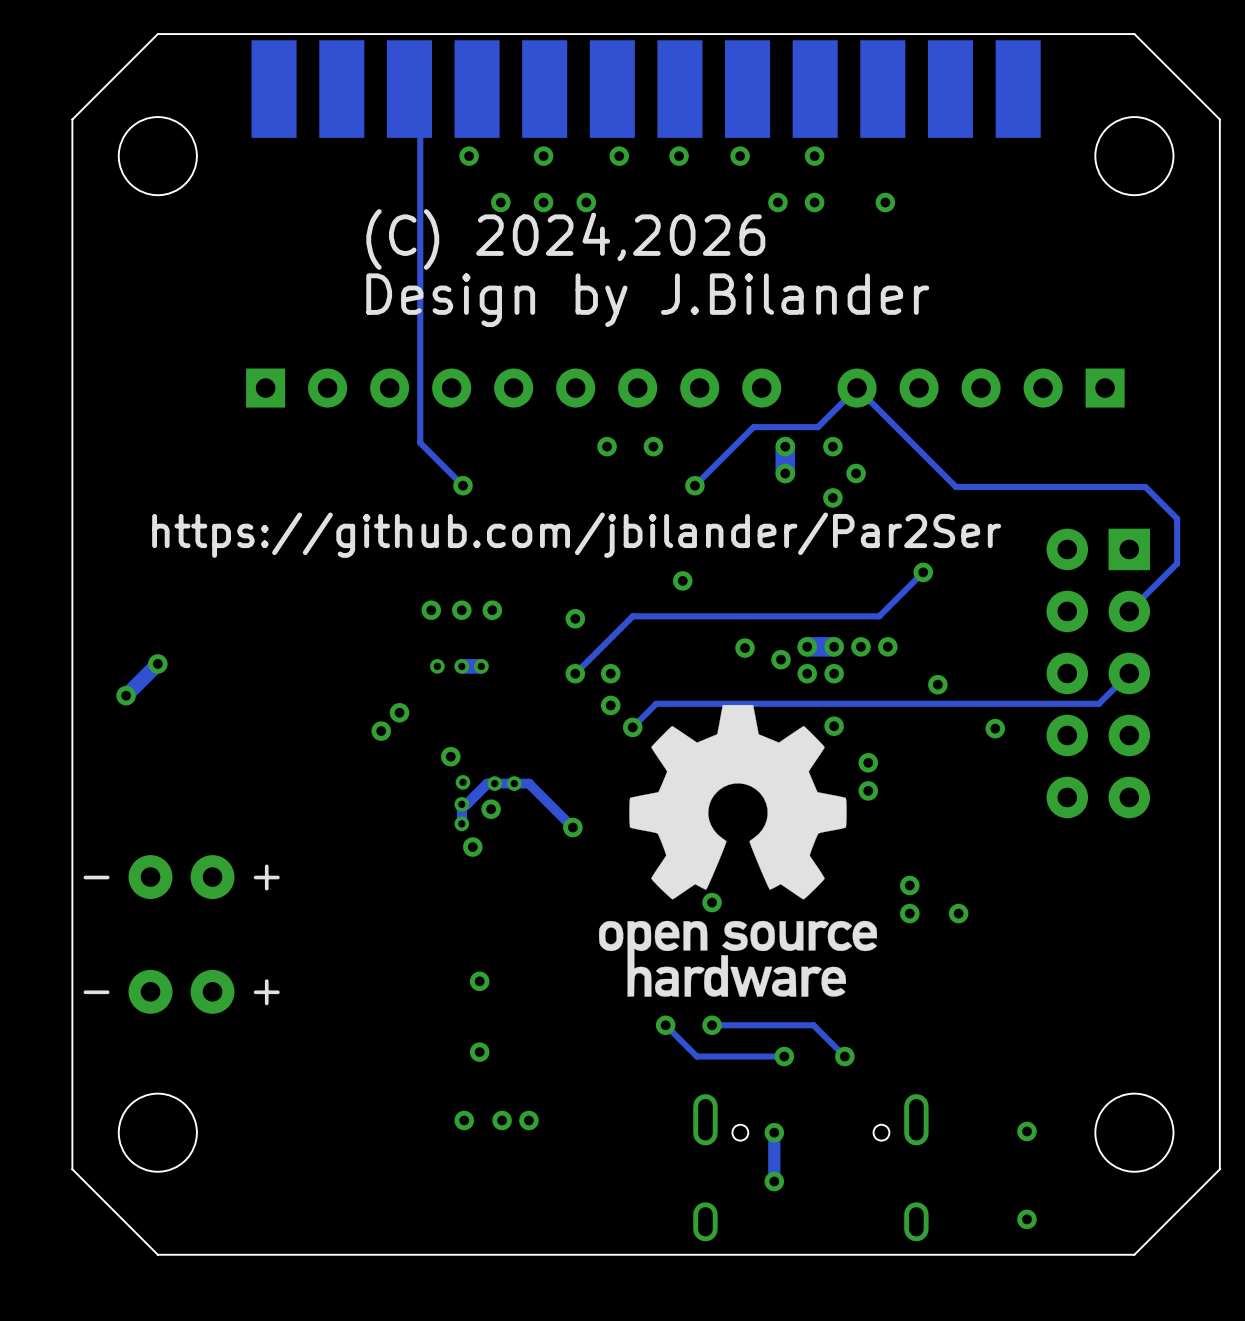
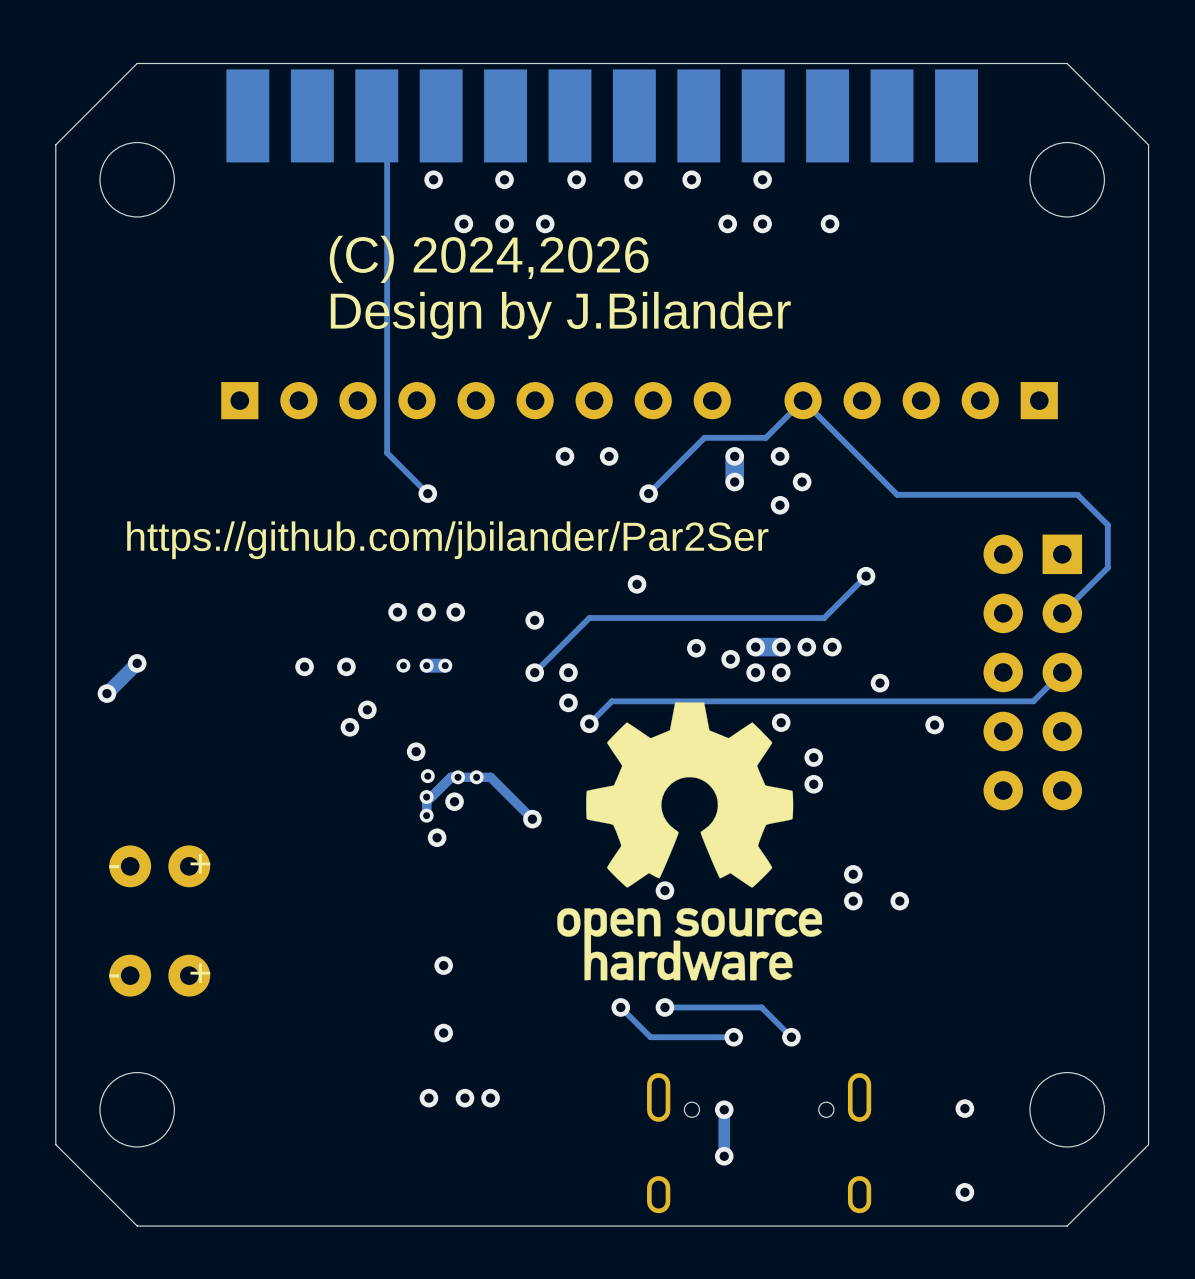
via: none -> (304, 666)
via: none -> (346, 666)

